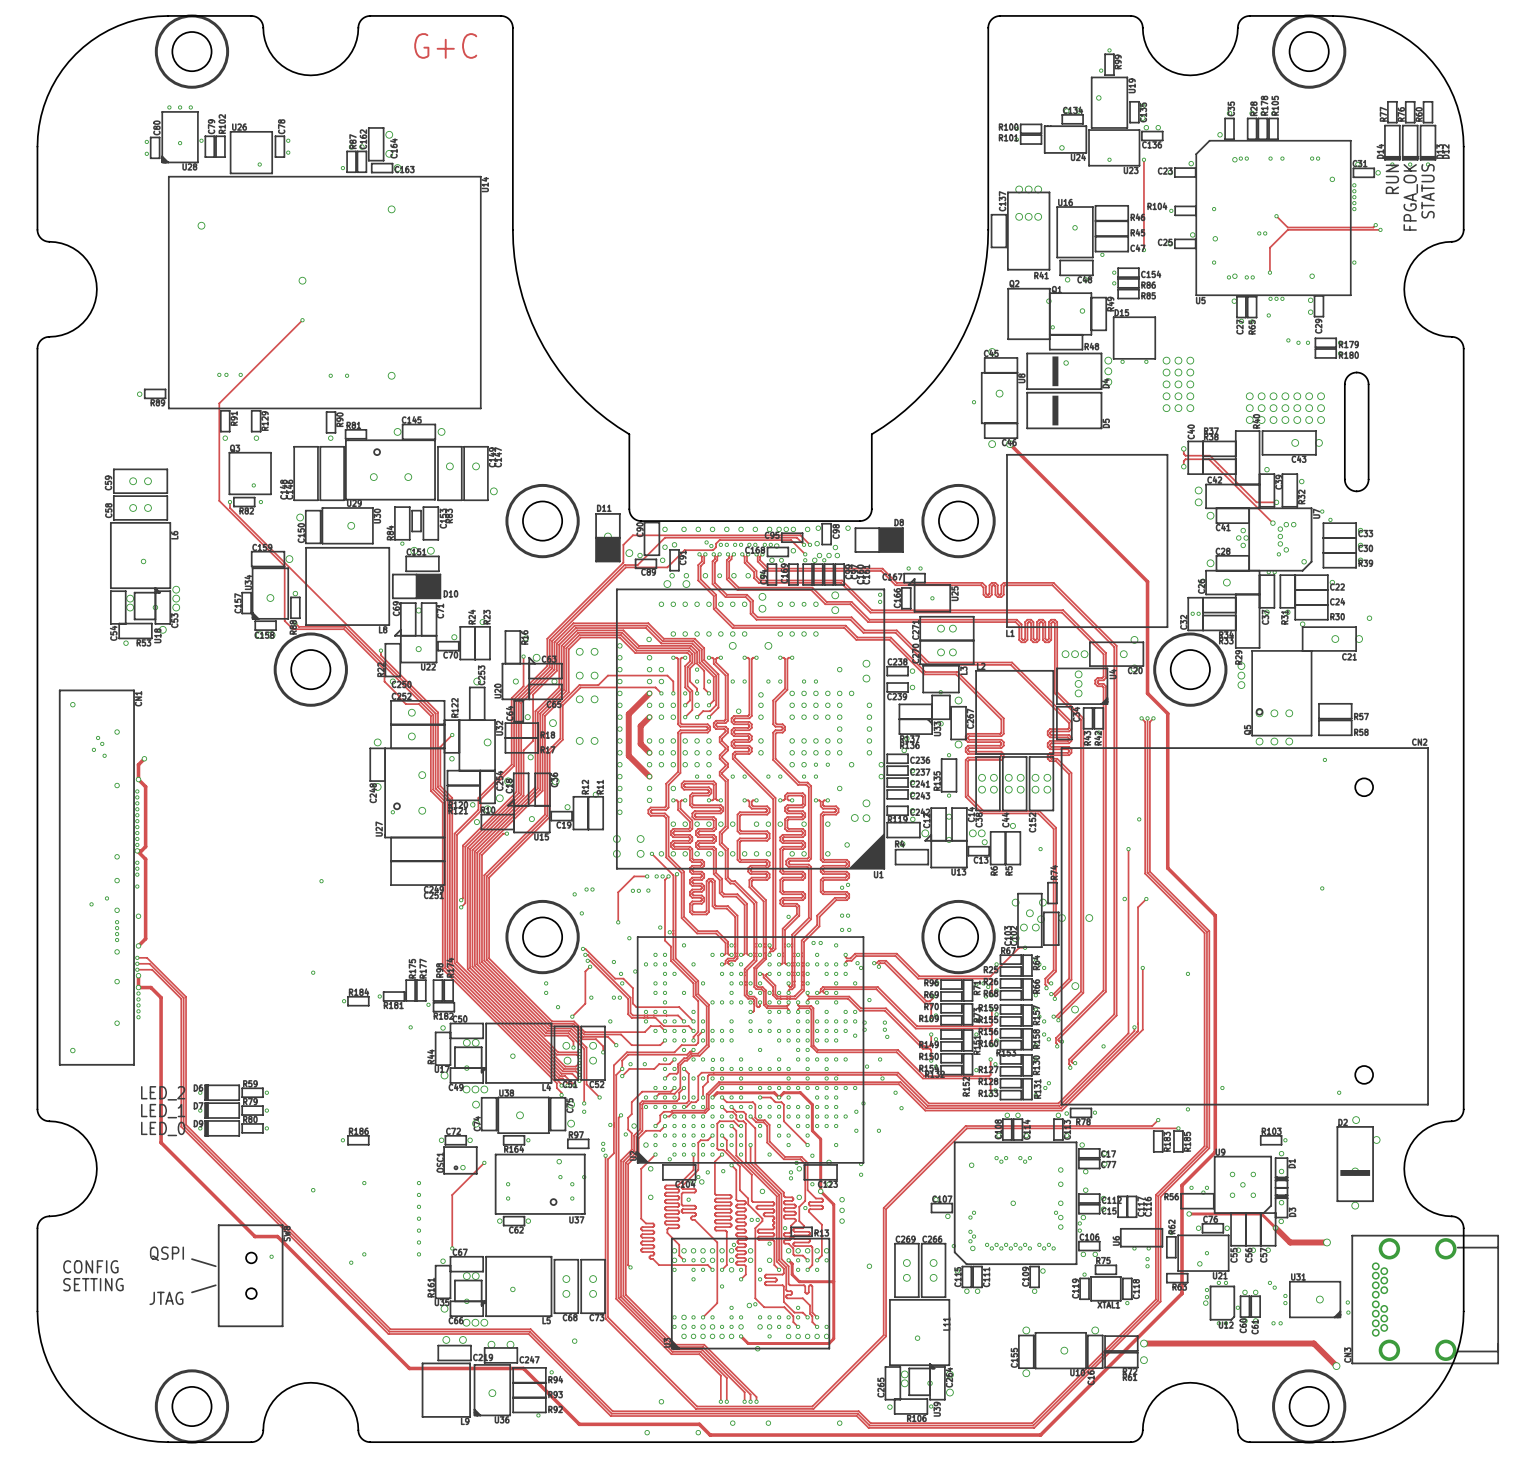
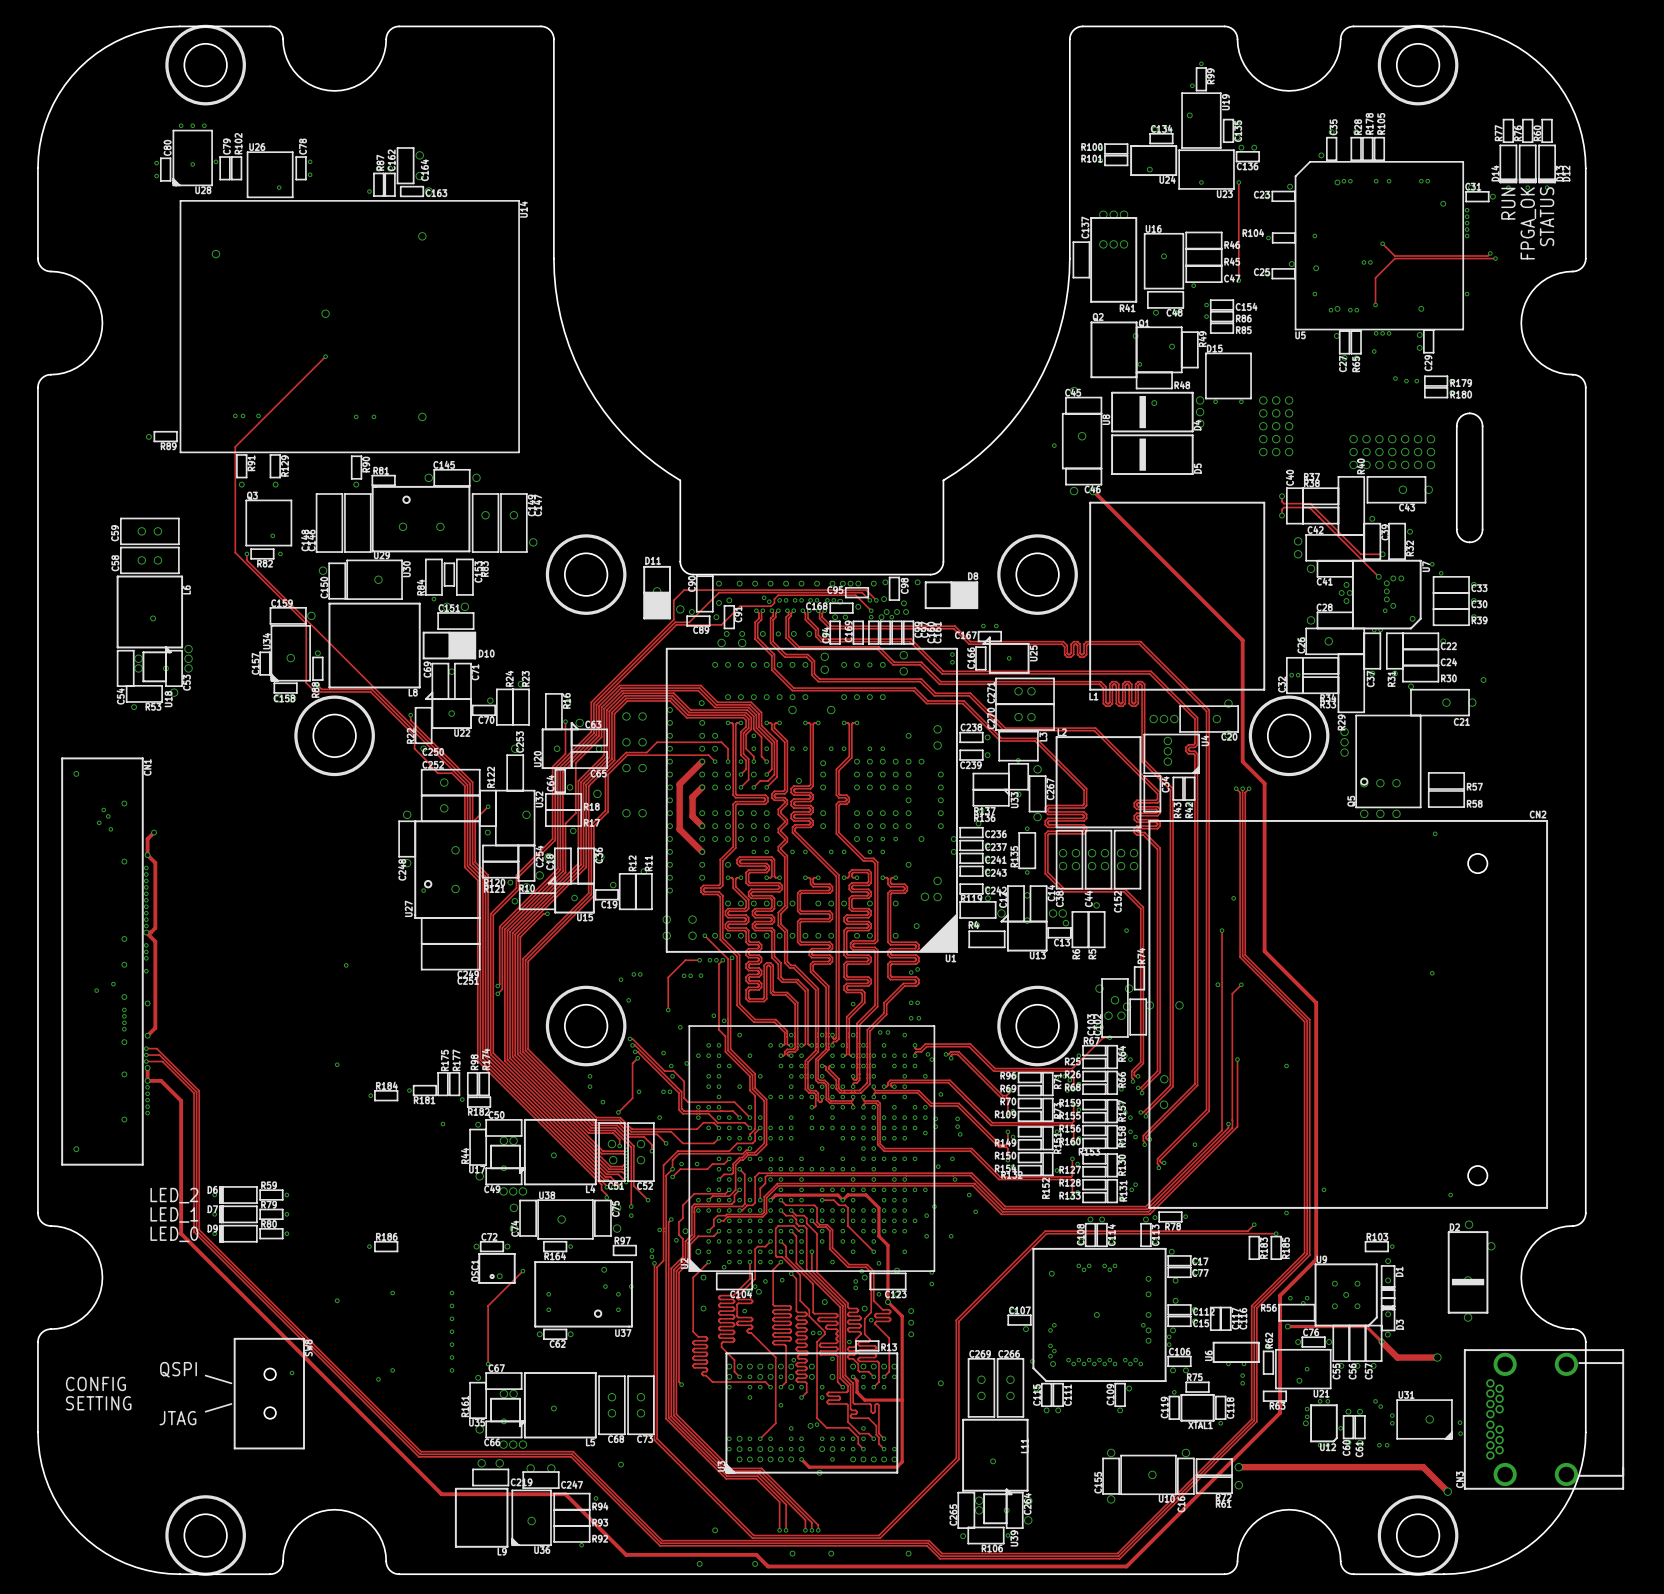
text: G+C (445, 45) -> none
track: (161, 997) (161, 1142) (254, 1236) (277, 1236) -> (172, 1091) (181, 1100) (181, 1233) (298, 1351)

